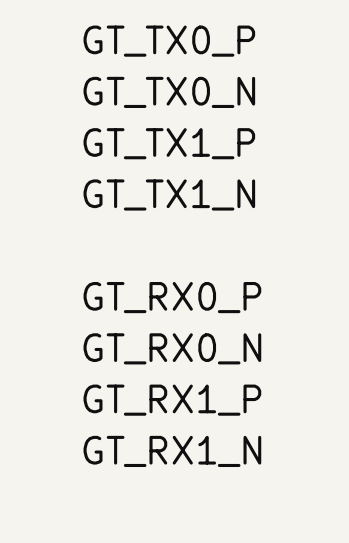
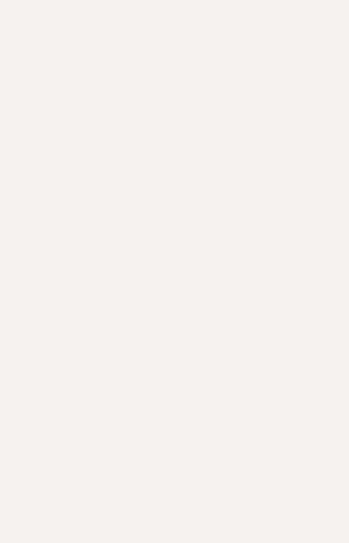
label: GT_TX0_P (169, 41) -> none
label: GT_TX0_N (169, 92) -> none
label: GT_TX1_P (169, 143) -> none
label: GT_TX1_N (169, 194) -> none
label: GT_RX0_P (172, 297) -> none
label: GT_RX0_N (172, 348) -> none
label: GT_RX1_P (172, 400) -> none
label: GT_RX1_N (172, 451) -> none

